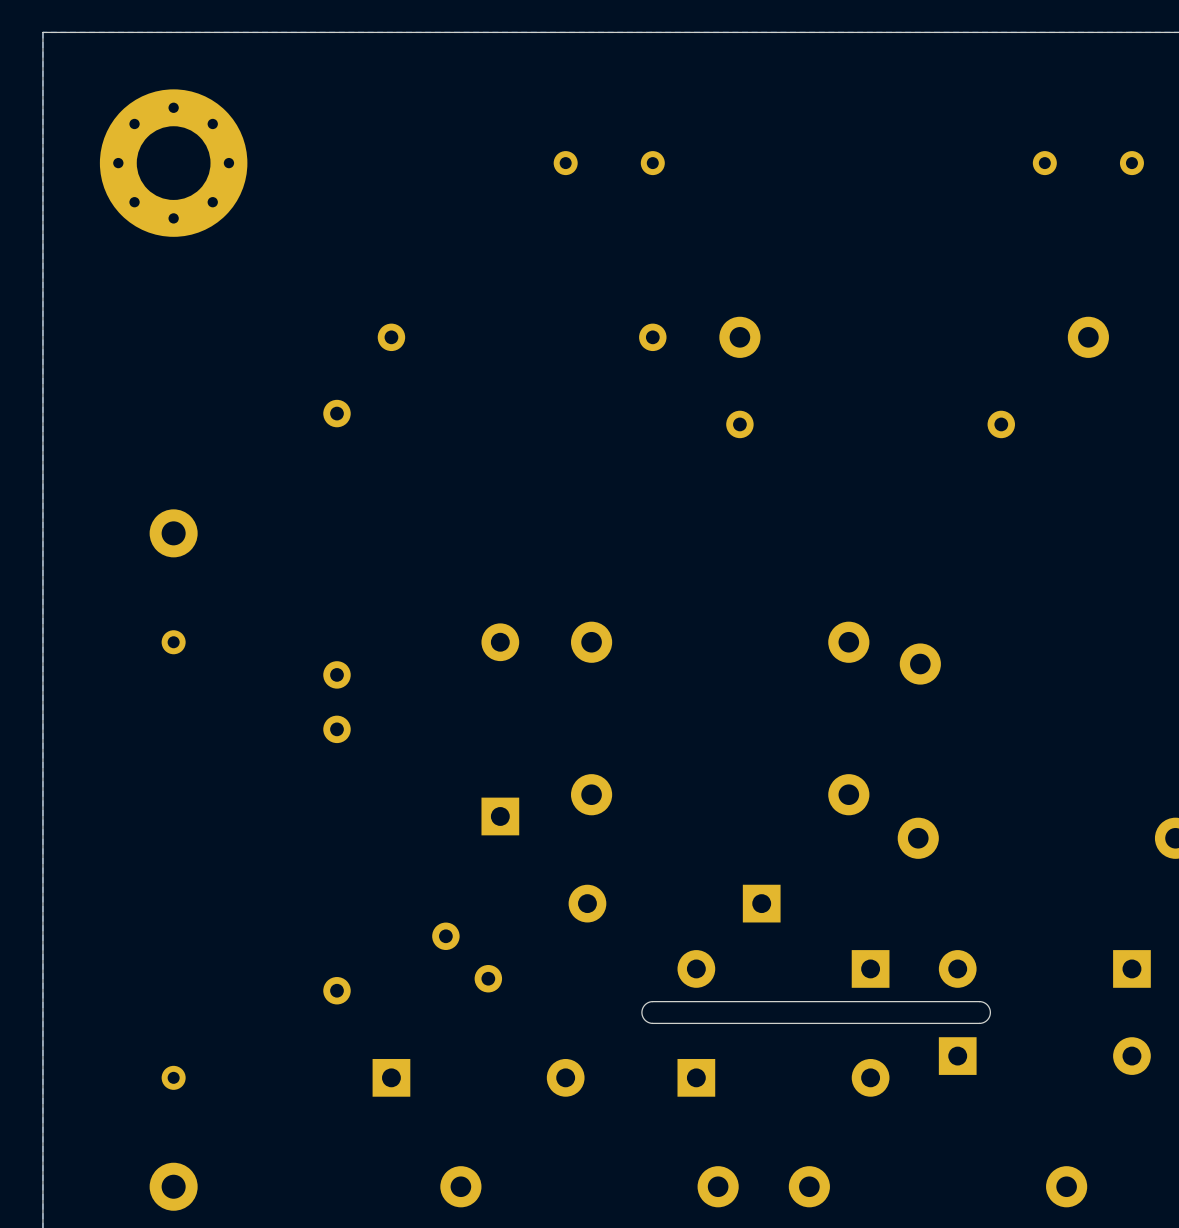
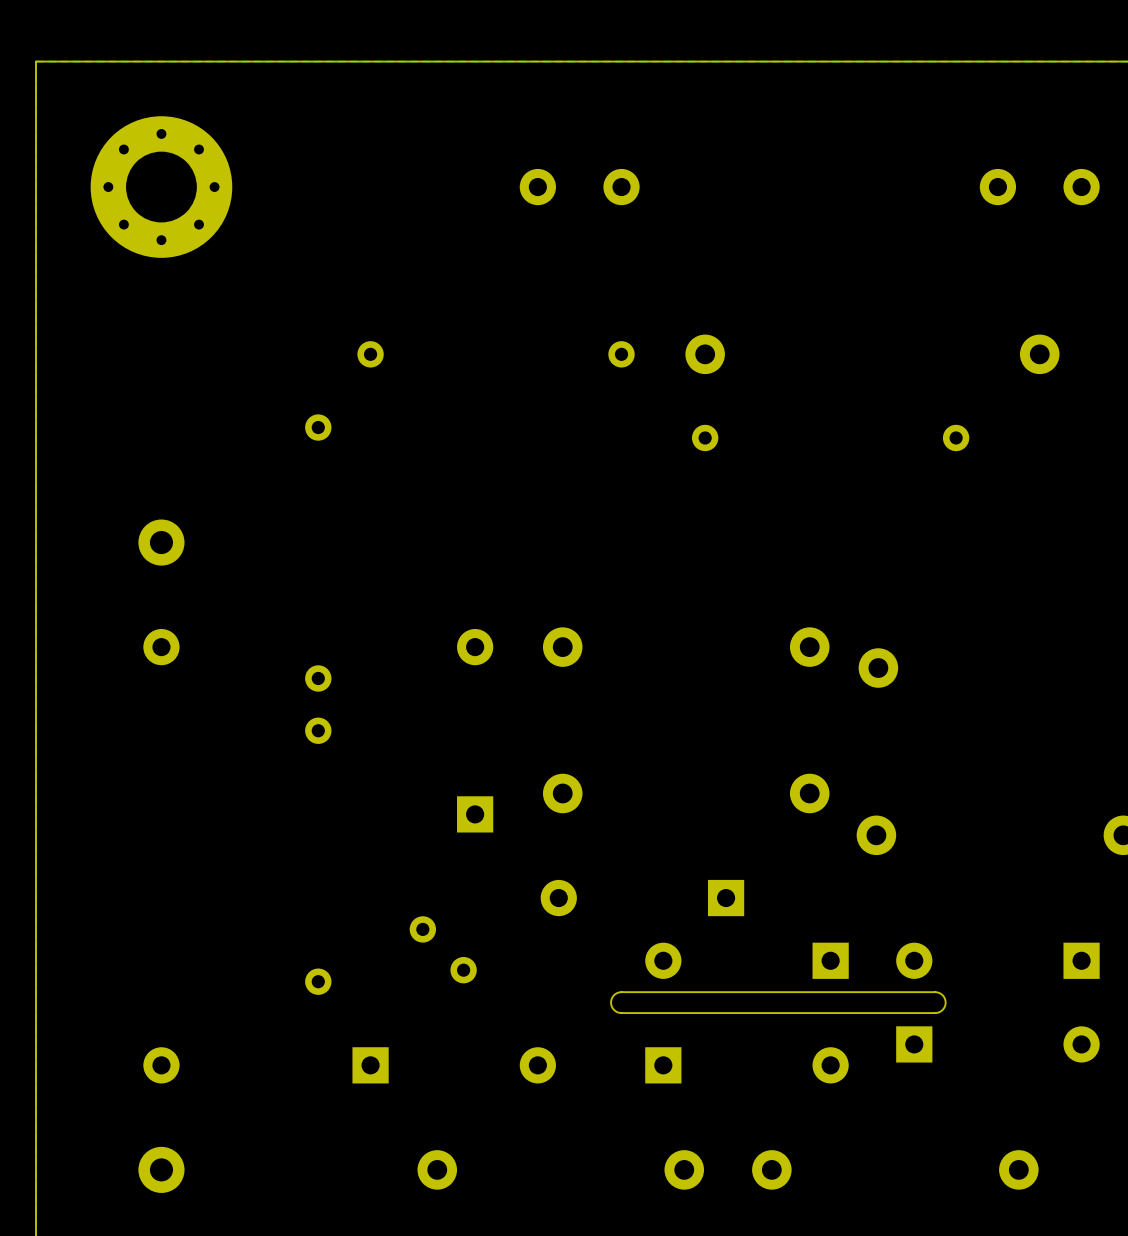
part footprint: [553, 151, 578, 176] -> [519, 168, 556, 206]
part footprint: [640, 151, 665, 176] -> [603, 168, 640, 206]
part footprint: [1032, 151, 1057, 176] -> [979, 168, 1017, 206]
part footprint: [1119, 151, 1144, 176] -> [1063, 168, 1100, 206]
part footprint: [161, 630, 186, 655] -> [143, 628, 180, 666]
part footprint: [161, 1065, 186, 1090] -> [143, 1047, 180, 1084]

